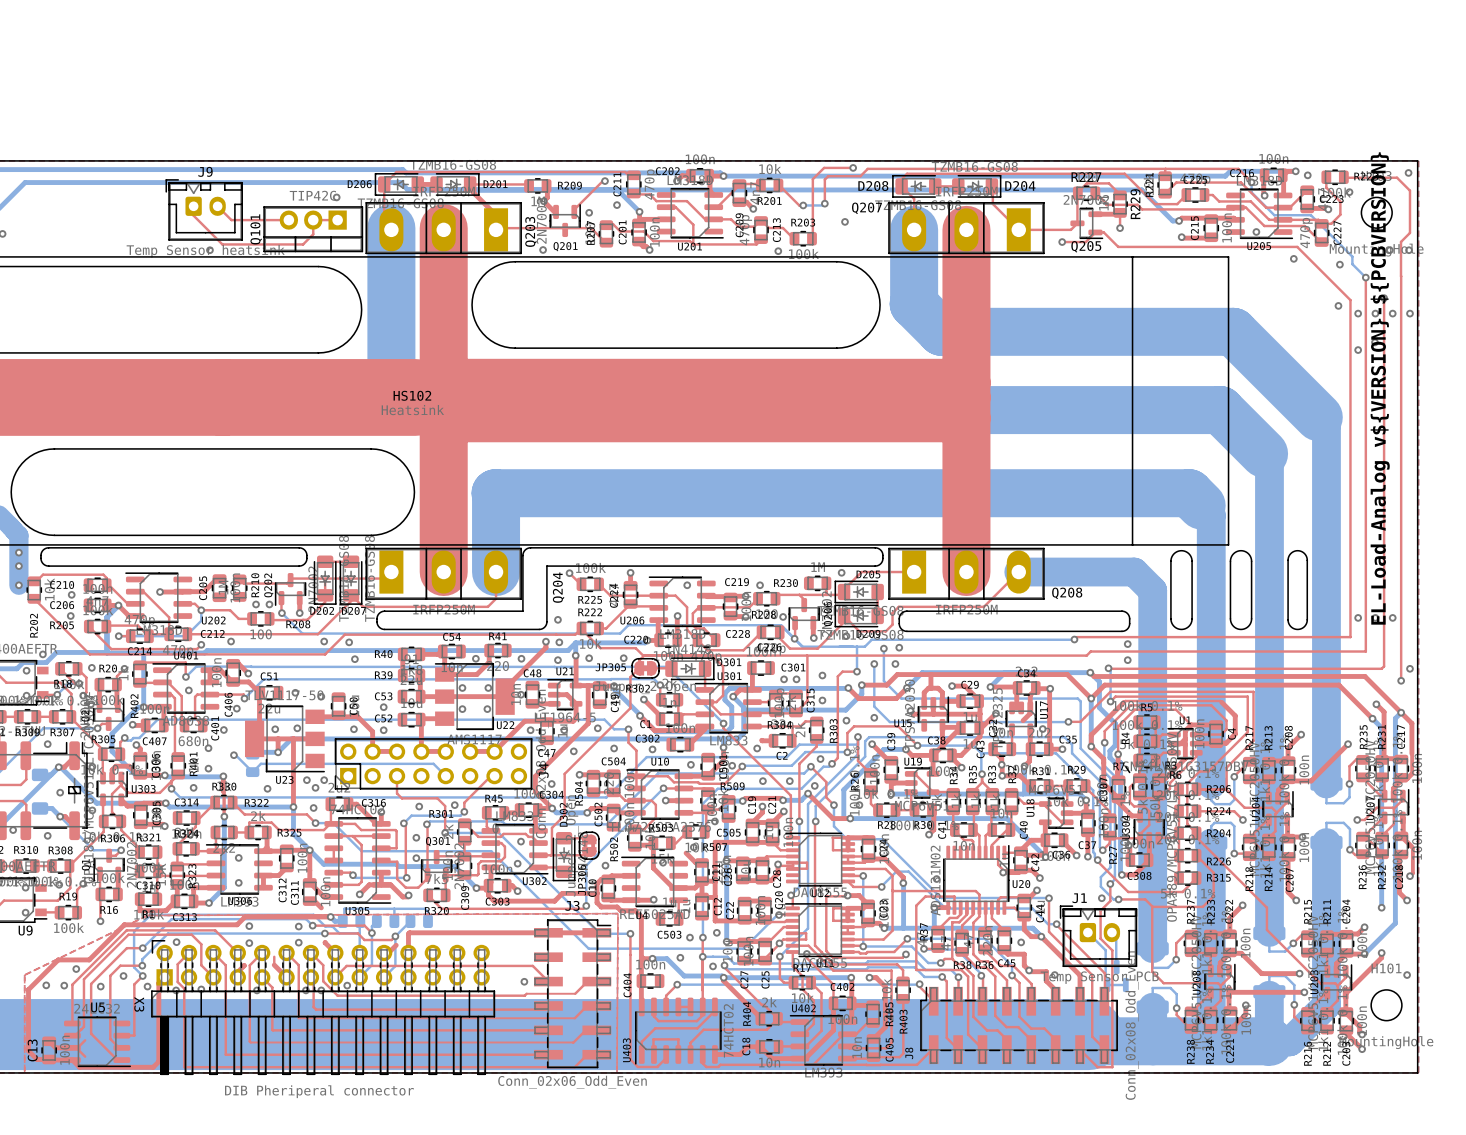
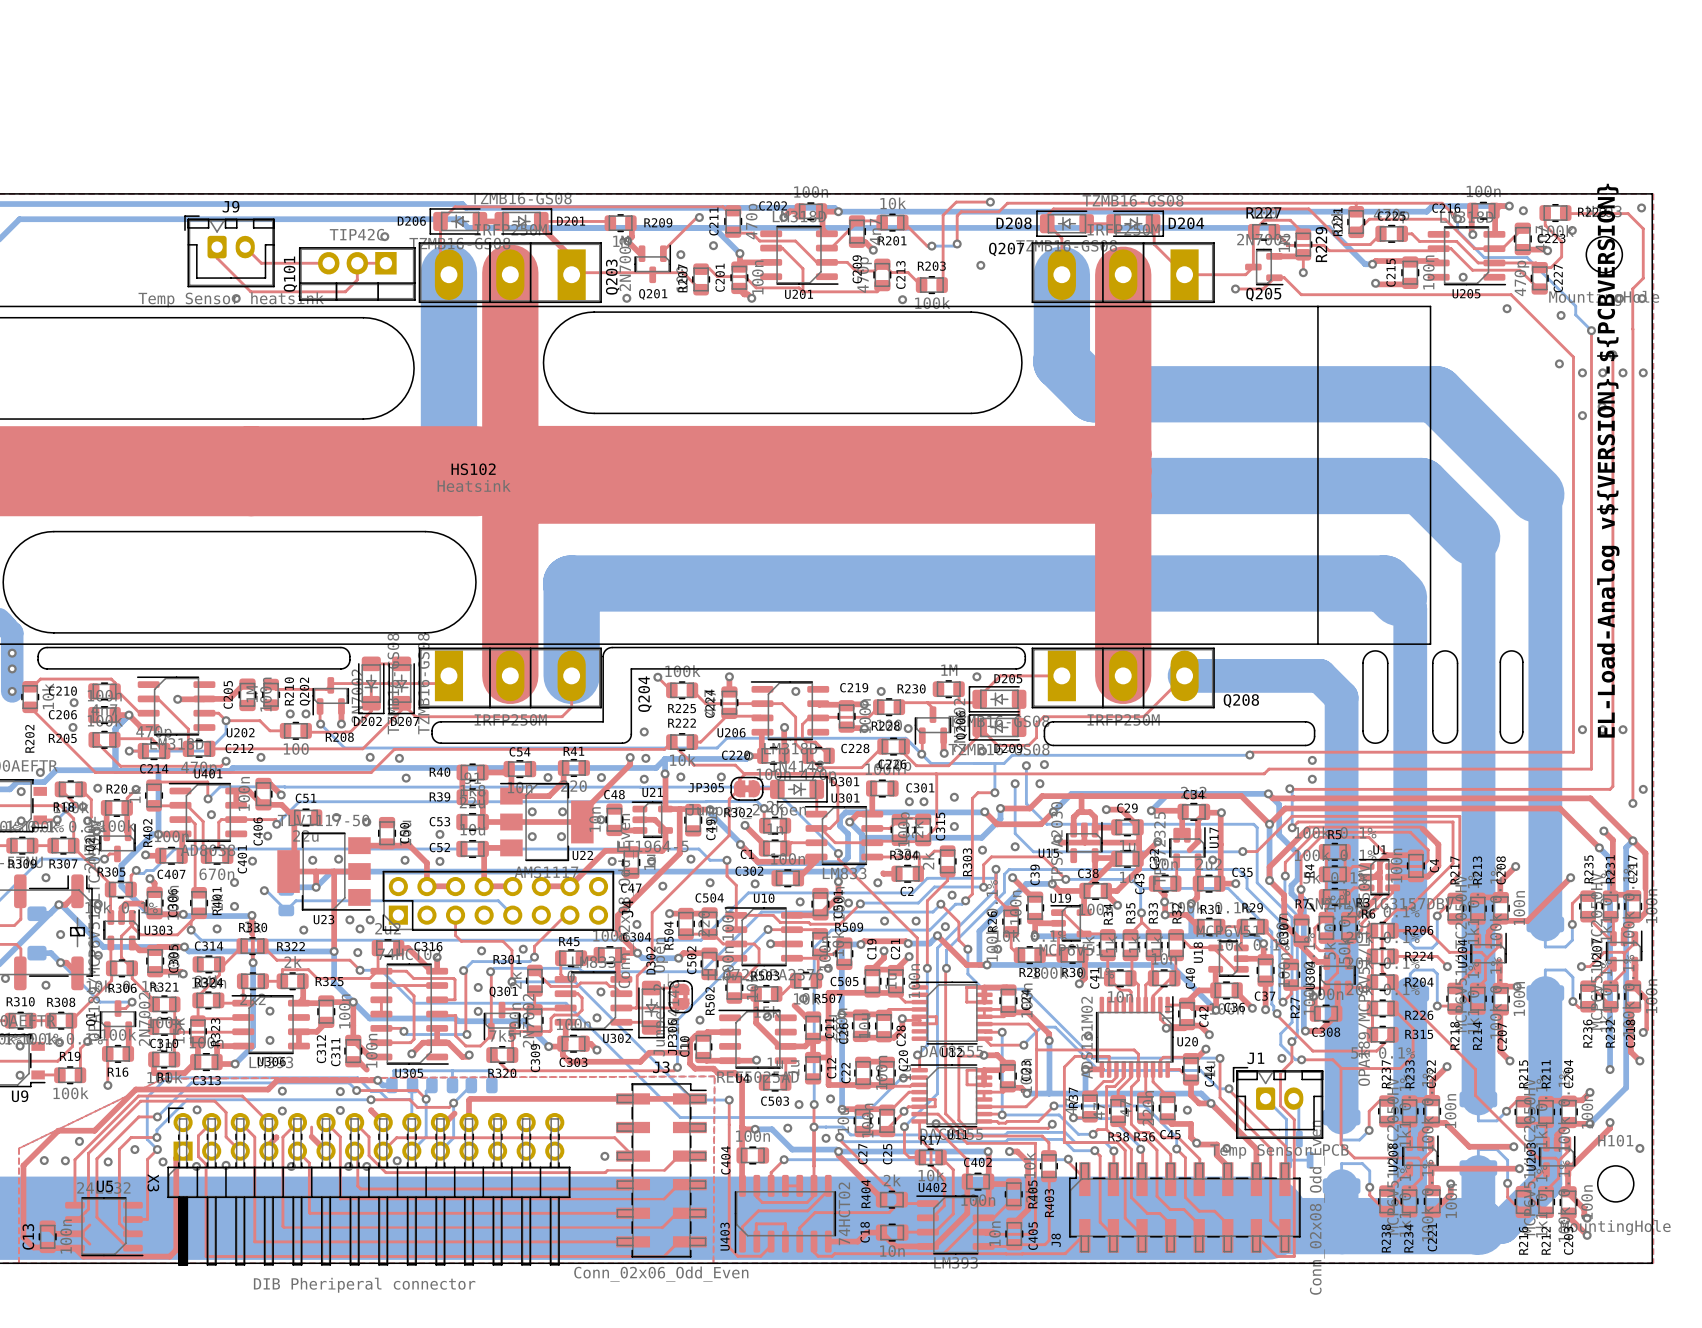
C401 value: 680n (193, 741) -> 670n (216, 874)

